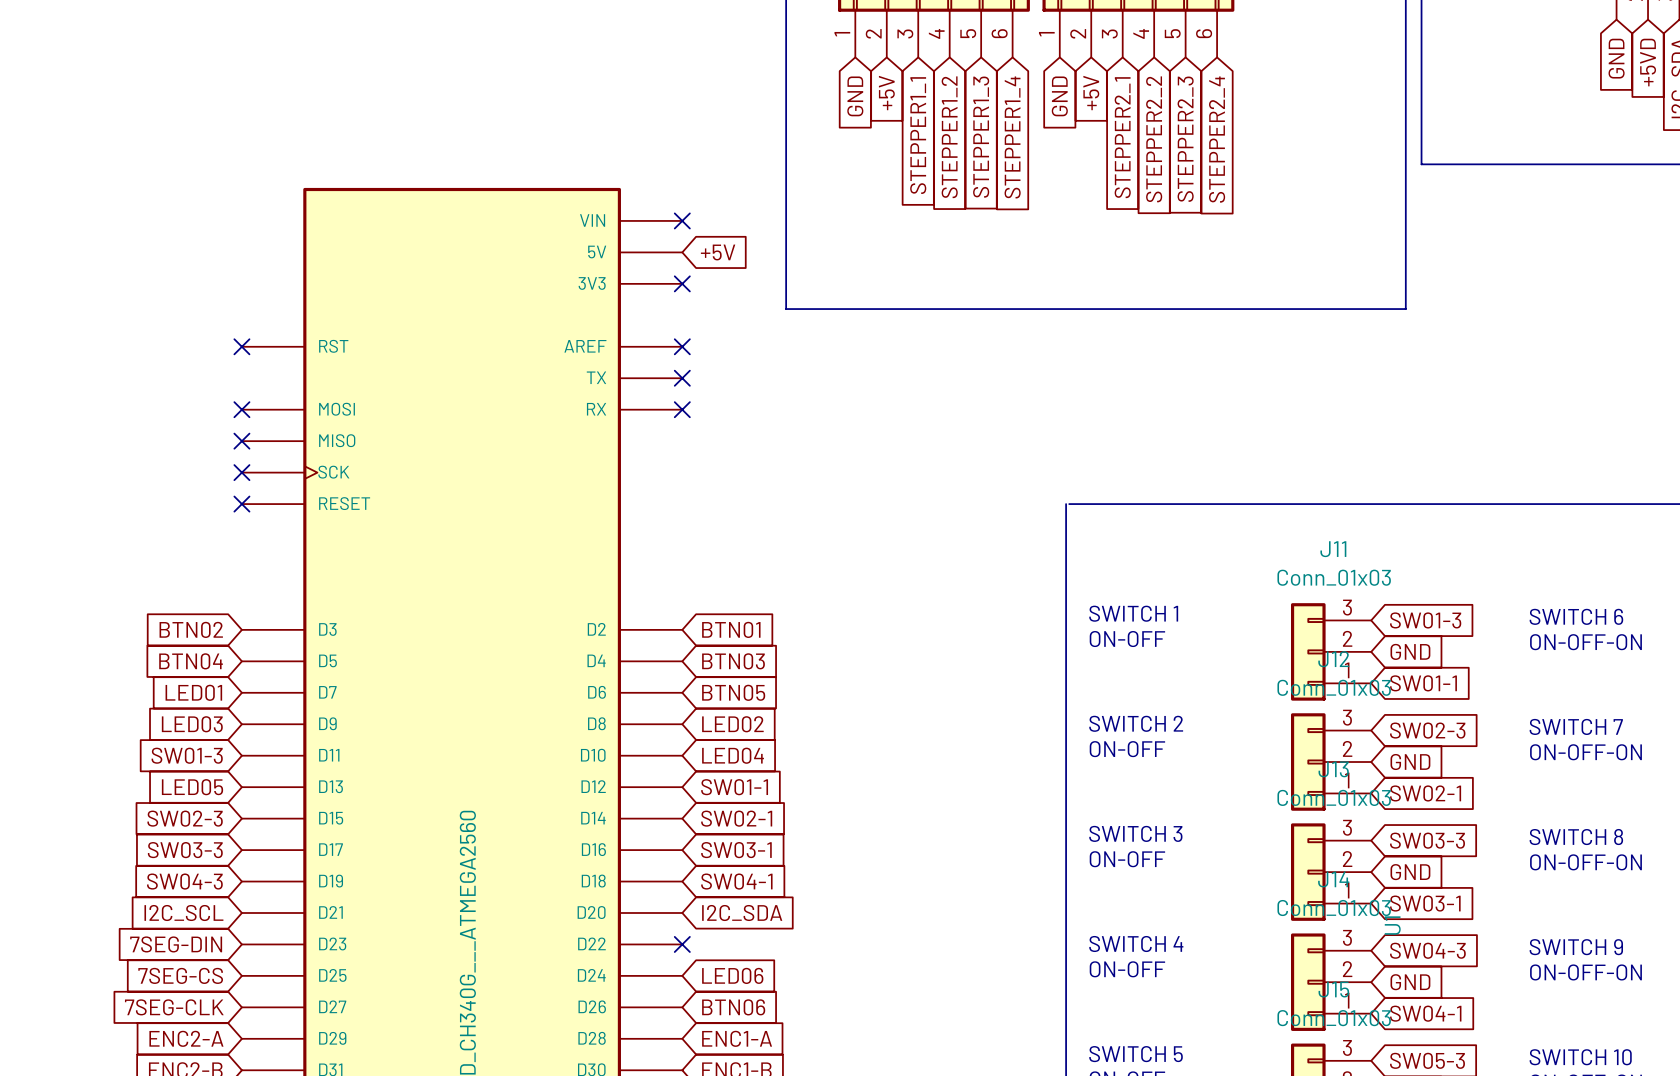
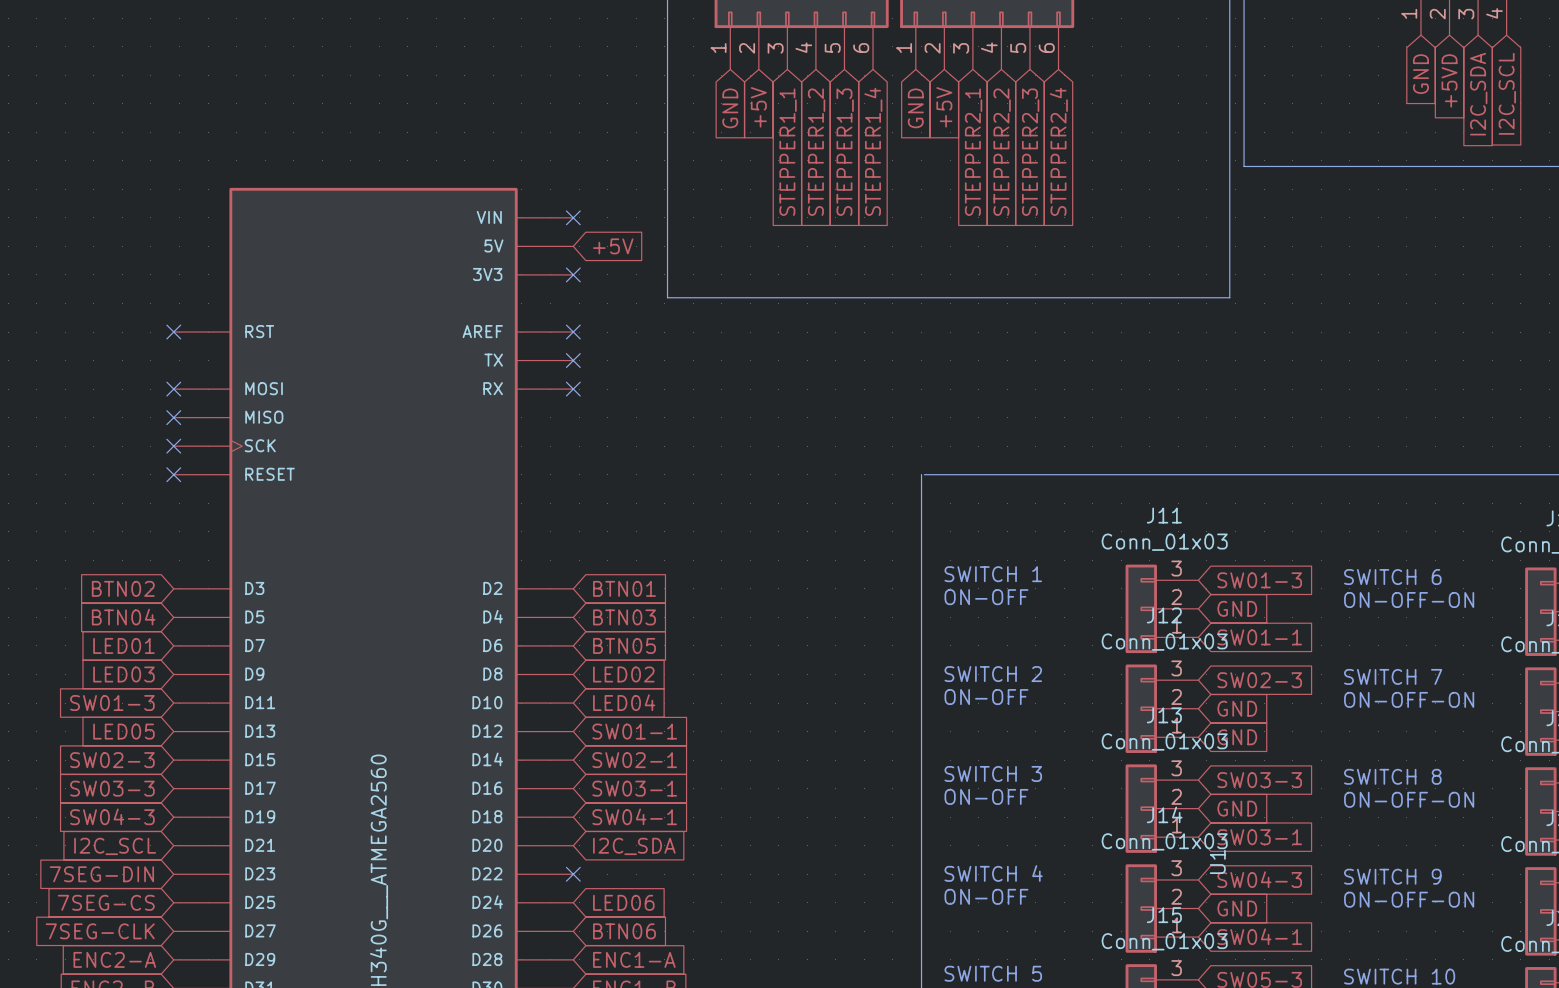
global label: SW02-1 (1425, 793) -> GND (1237, 737)

